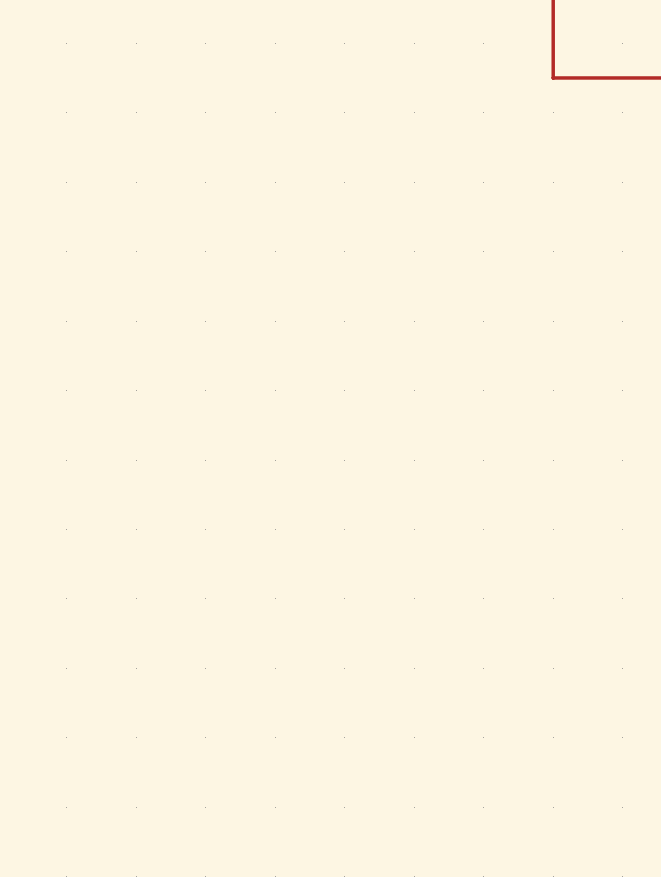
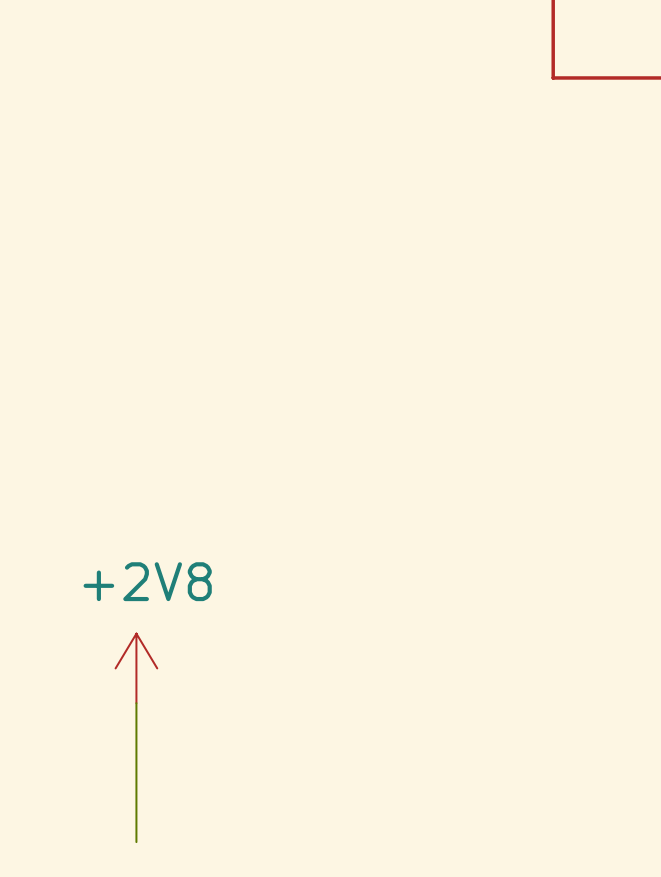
power symbol: none -> +2V8 (136, 668)
wire: none -> (136, 703) (136, 842)

